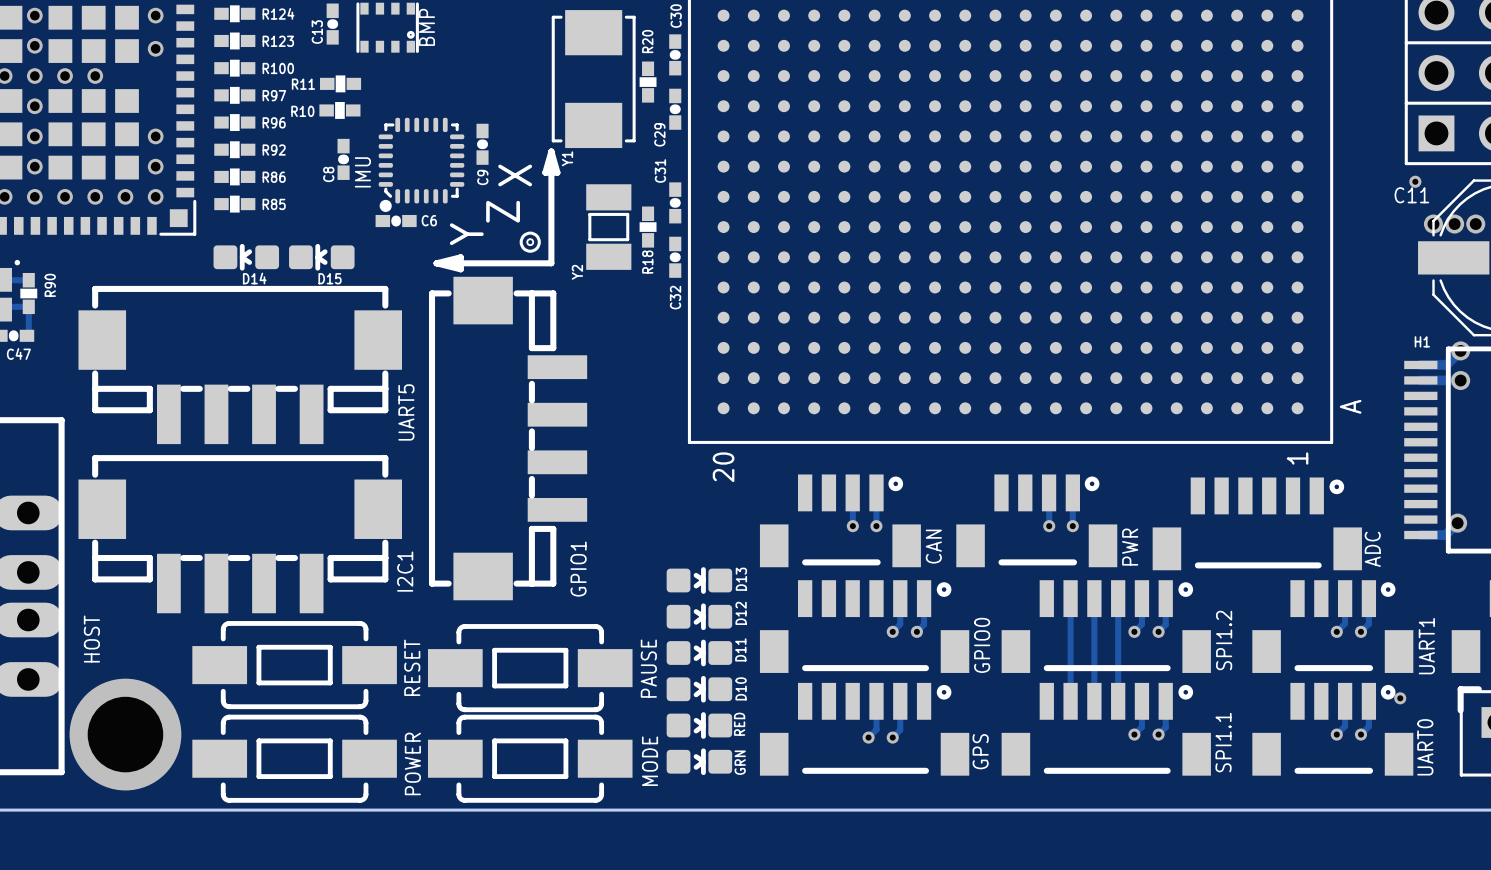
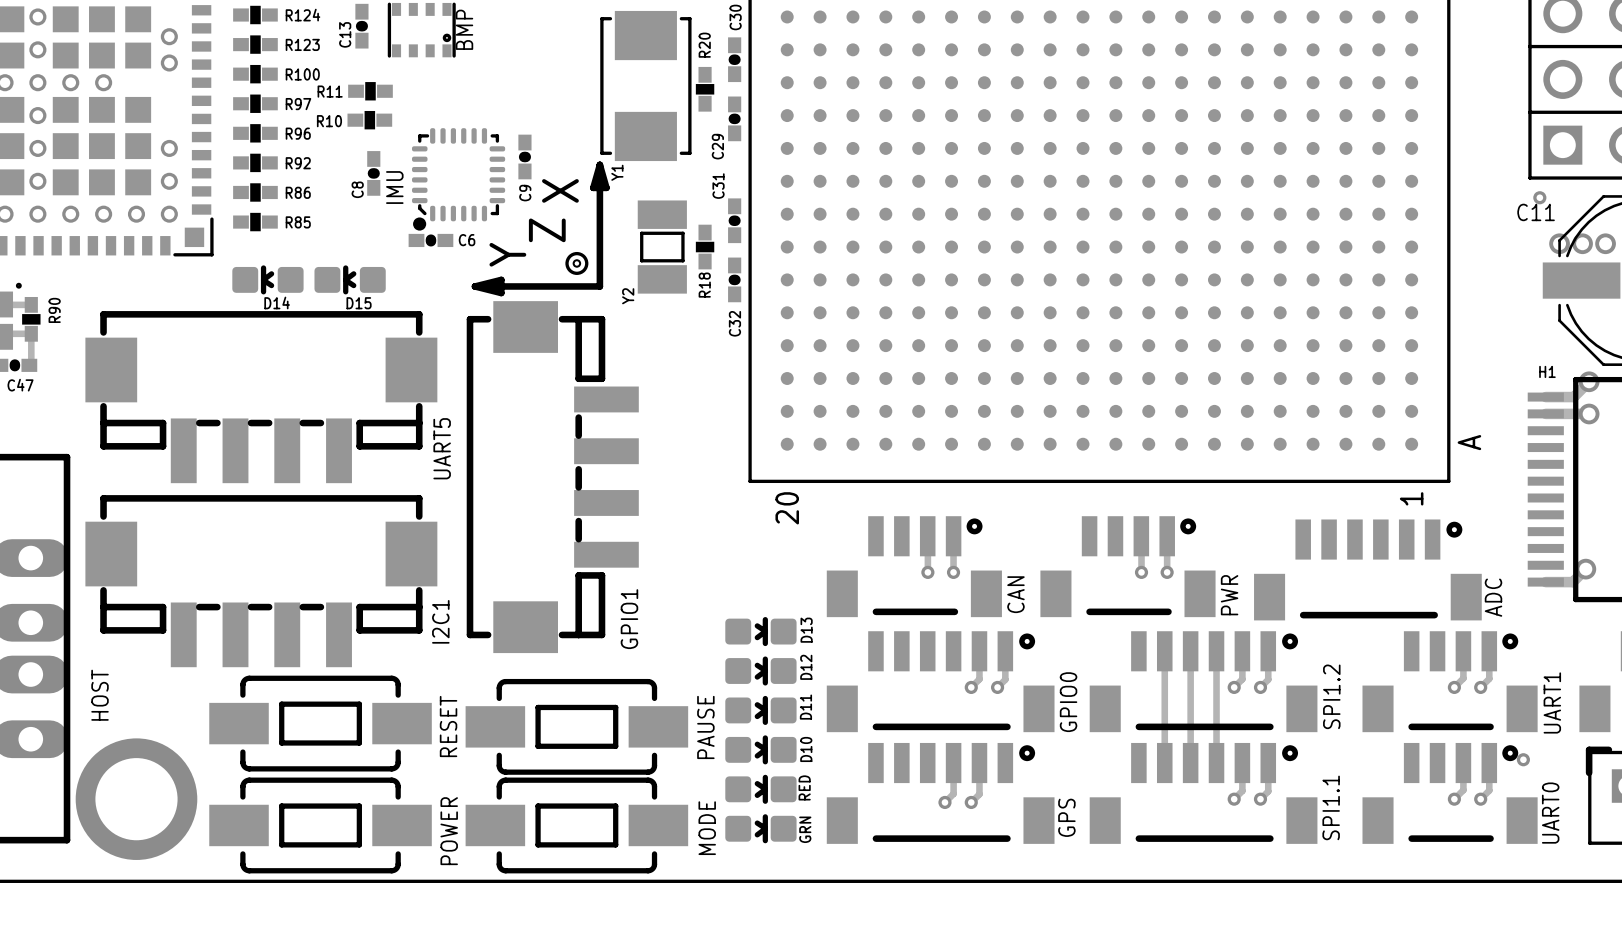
via: (155, 15) -> none
via: none -> (169, 36)
via: (155, 48) -> none
via: none -> (169, 62)

